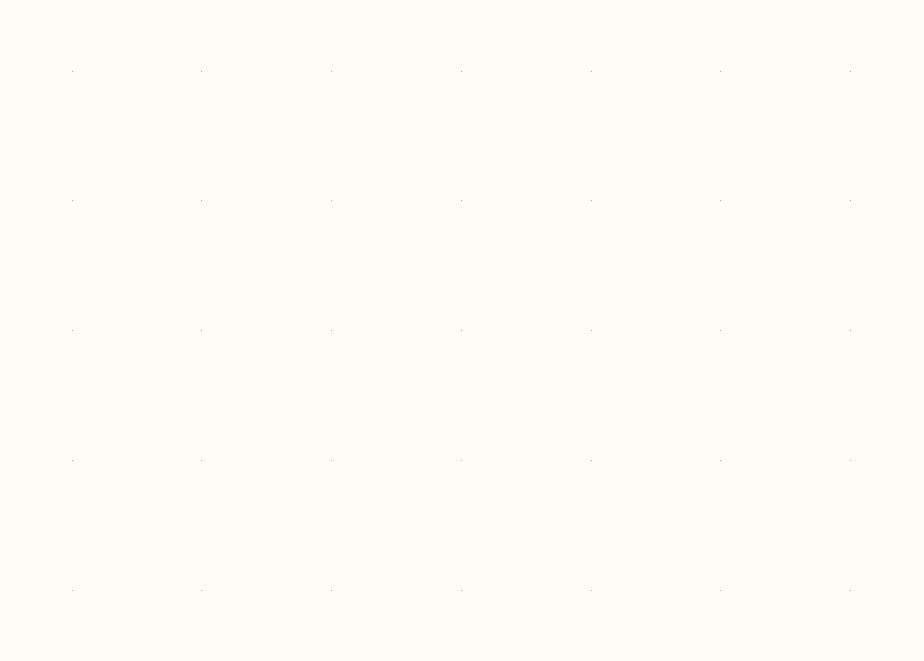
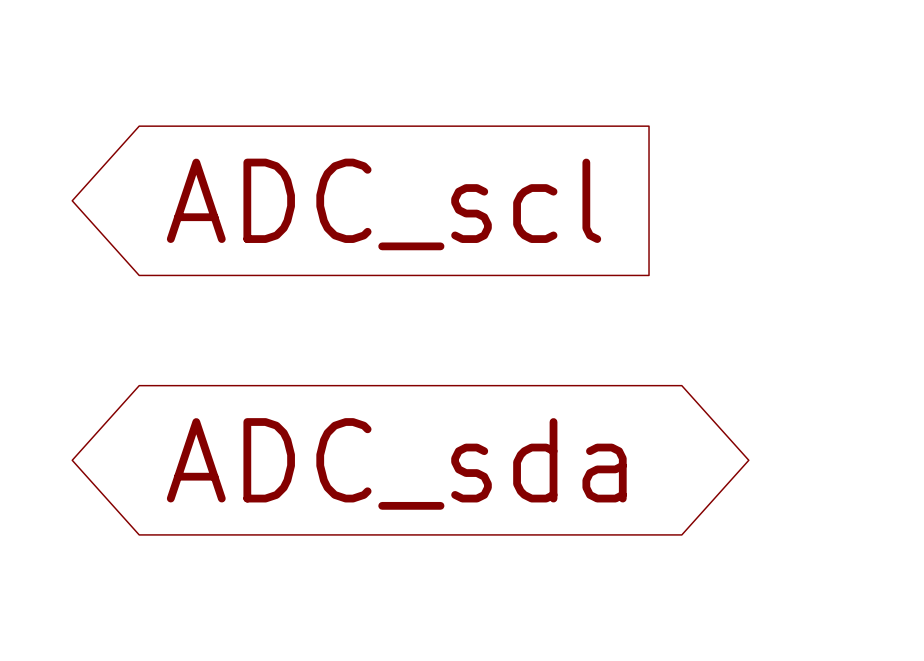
global label: none -> ADC_scl (384, 204)
global label: none -> ADC_sda (396, 463)

